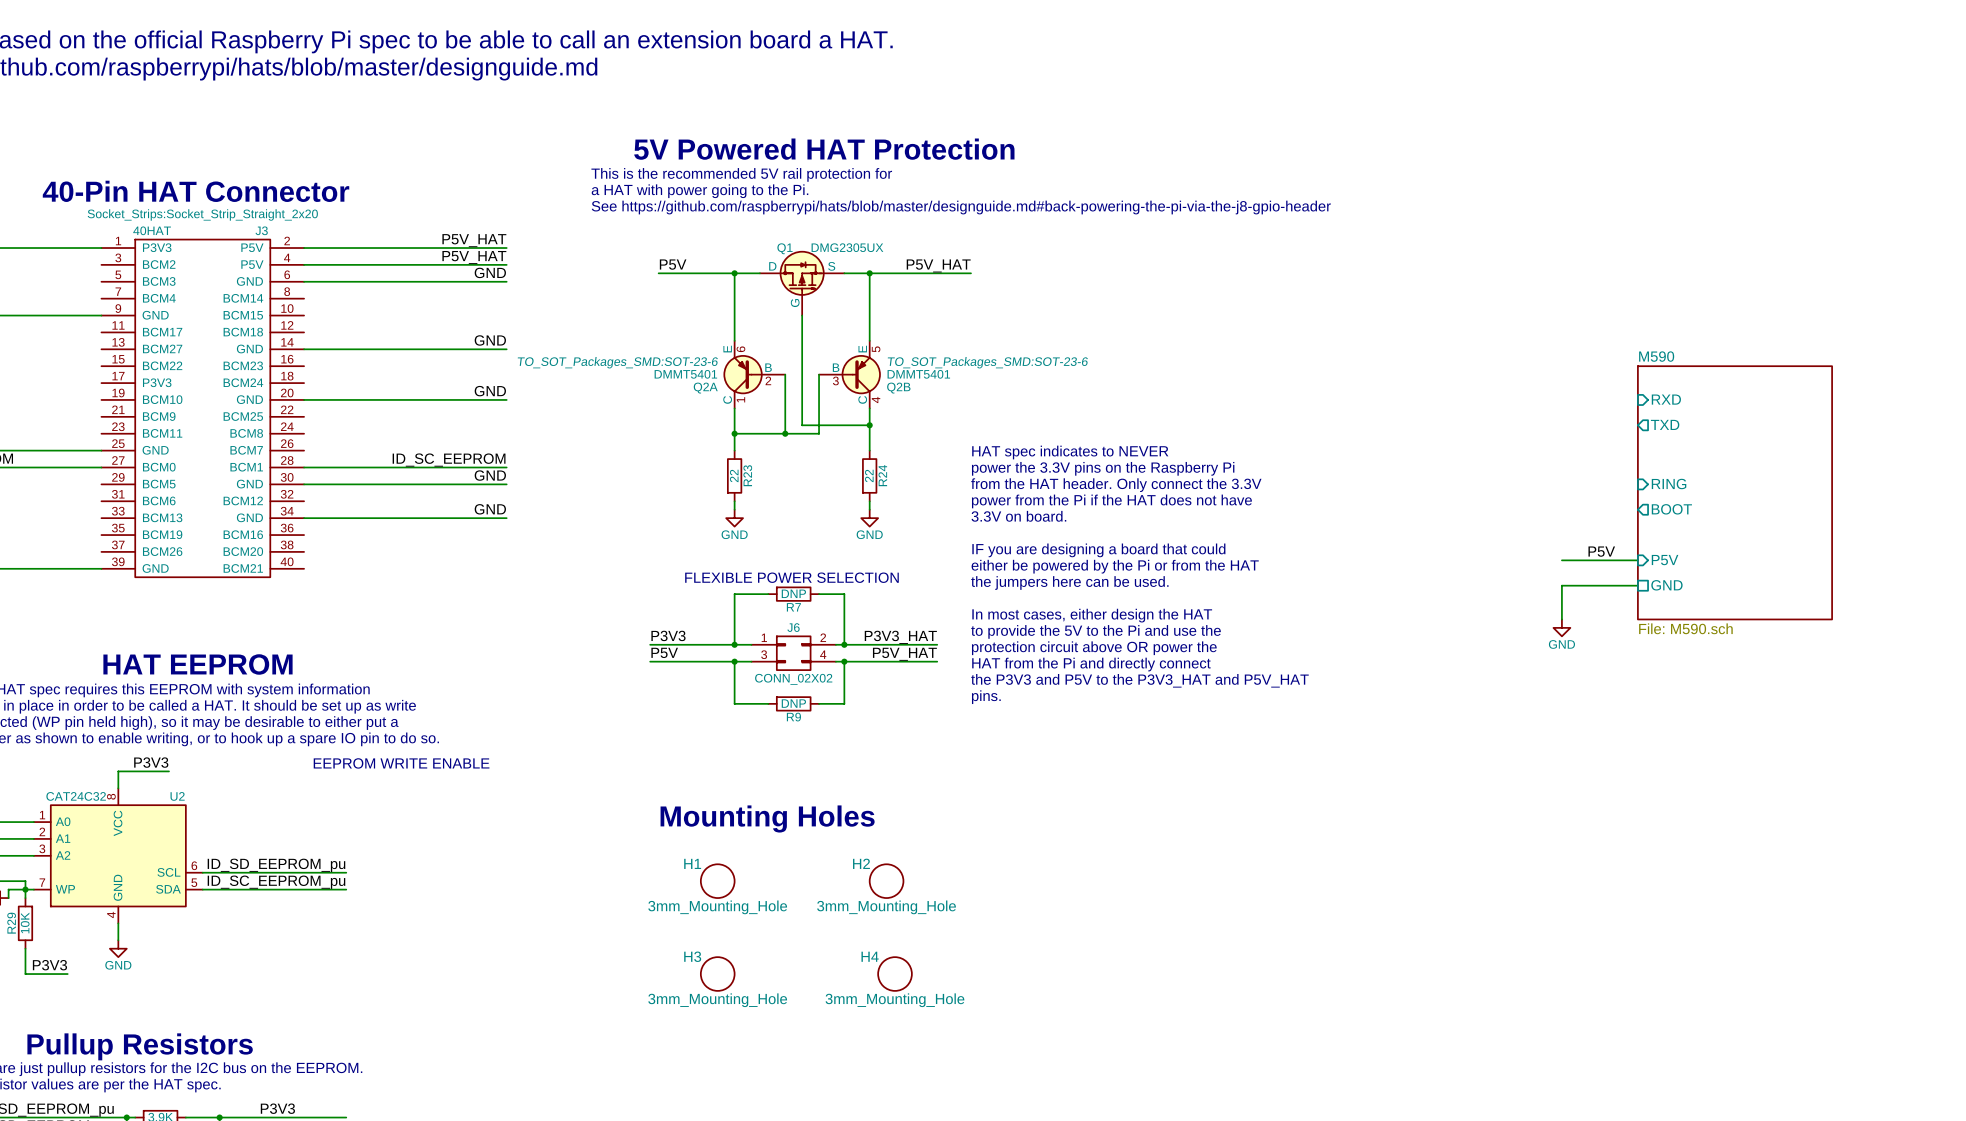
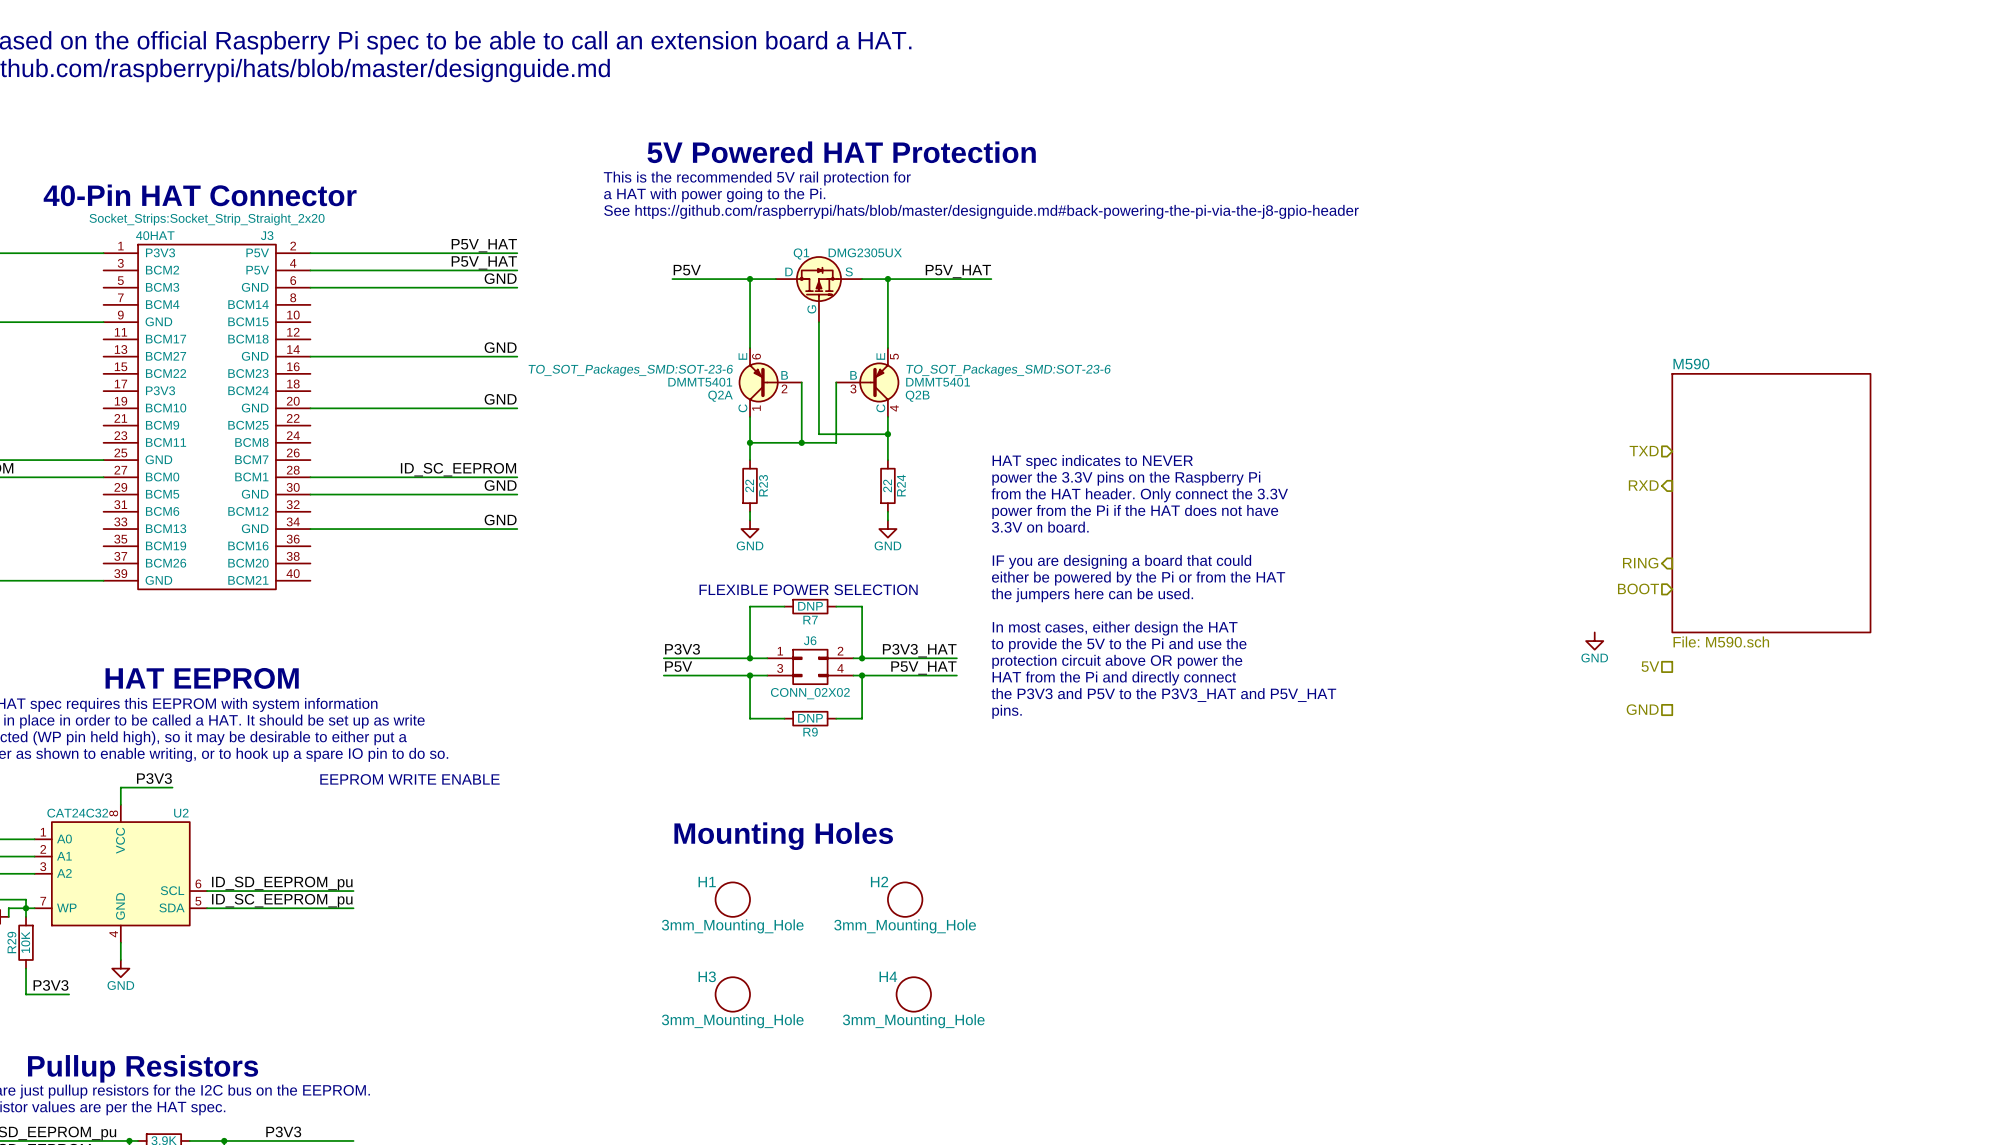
sheet pin: RXD (1666, 399) -> none
sheet pin: TXD (1665, 424) -> none
hierarchical label: none -> TXD (1644, 451)
hierarchical label: none -> RXD (1643, 485)
sheet pin: RING (1669, 484) -> none
sheet pin: BOOT (1671, 509) -> none
label: P5V (1601, 551) -> none
hierarchical label: none -> RING (1640, 563)
wire: (1561, 560) (1637, 560) -> none
sheet pin: P5V (1665, 560) -> none
hierarchical label: none -> BOOT (1638, 588)
wire: (1637, 585) (1561, 585) (1561, 619) -> none
sheet pin: GND (1666, 585) -> none
hierarchical label: none -> 5V (1650, 666)
hierarchical label: none -> GND (1642, 709)

